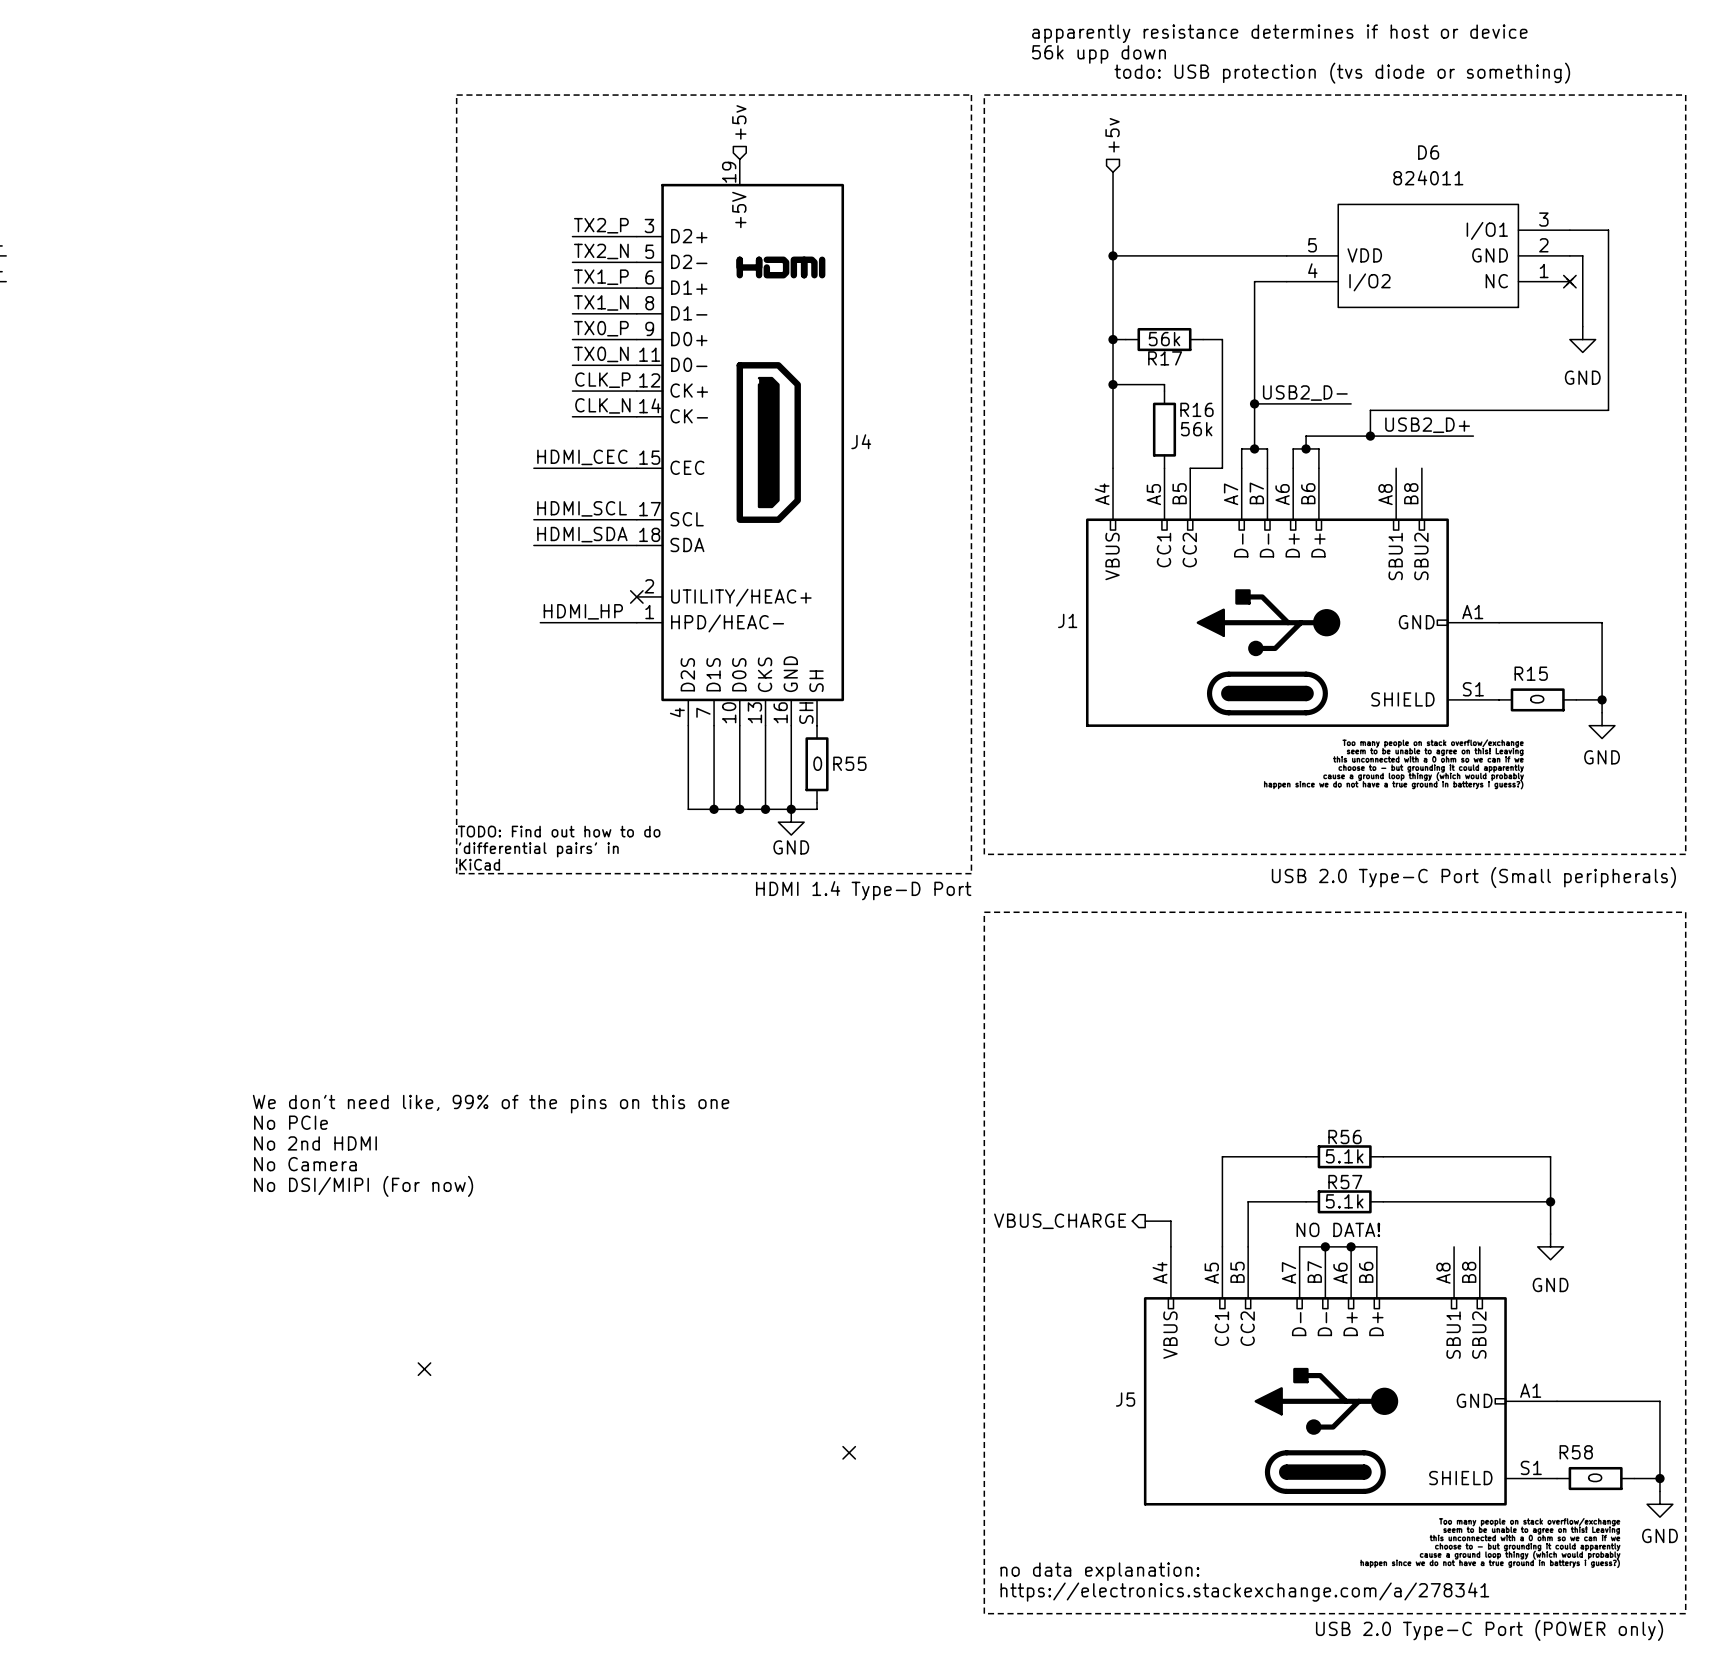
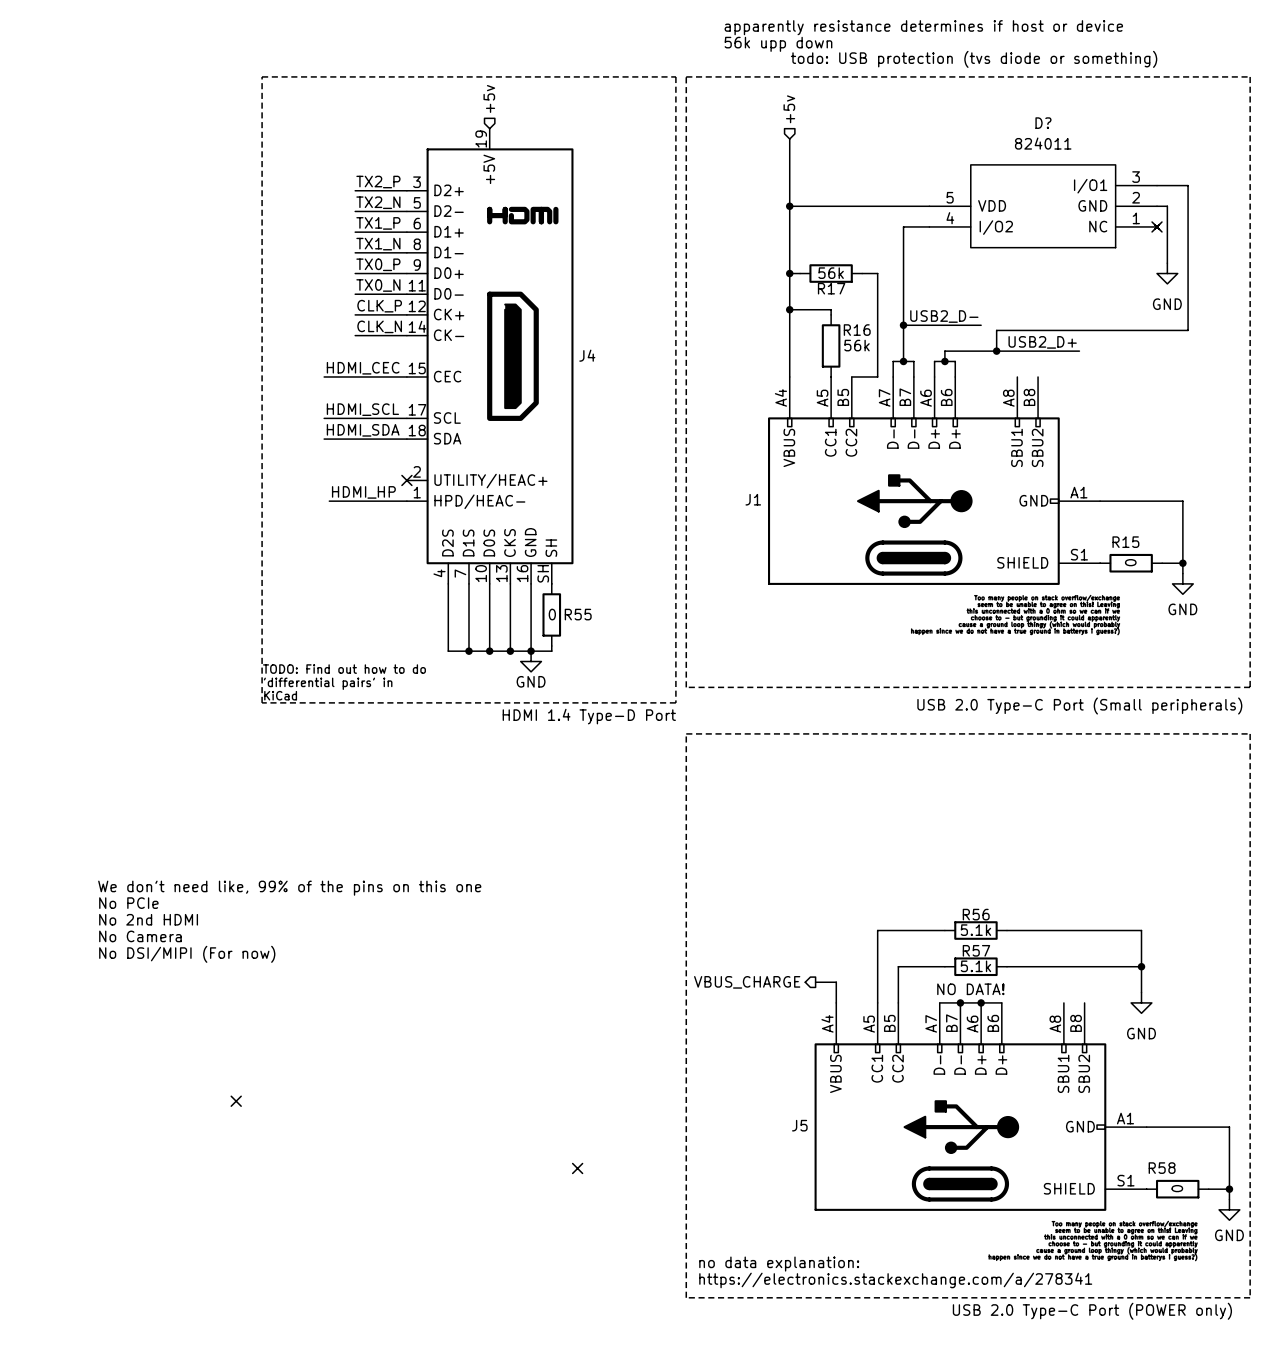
D6 name: D6 (1428, 152) -> D? (1043, 123)

